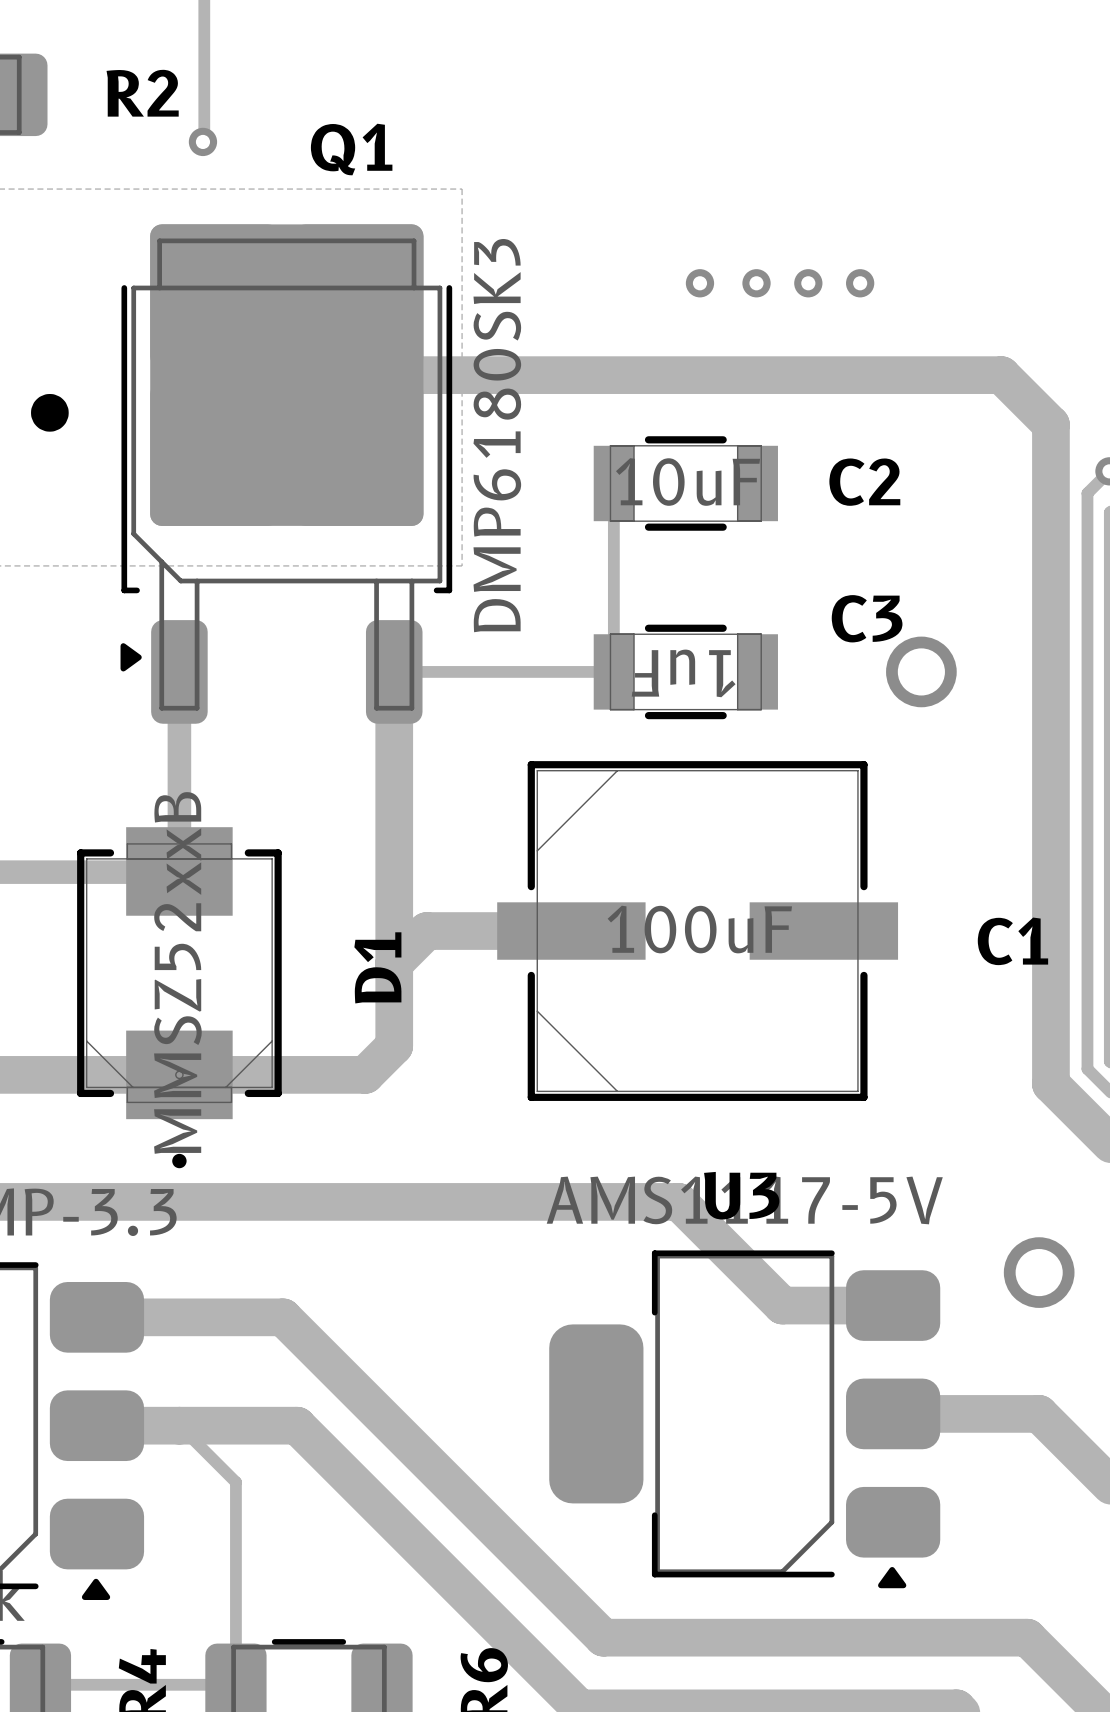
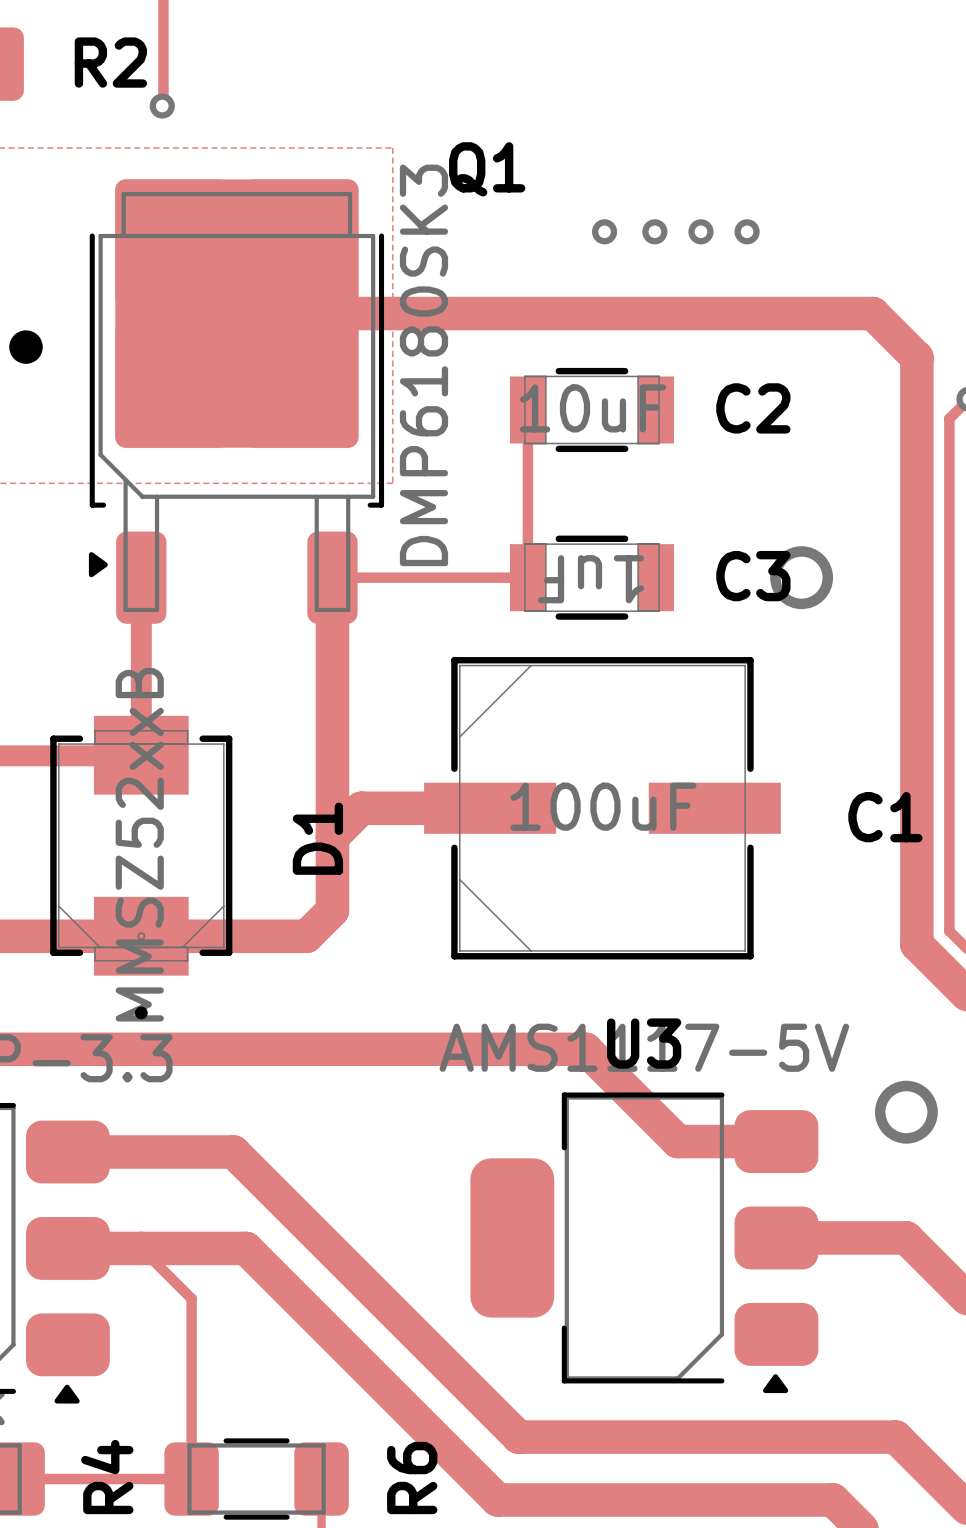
Q1 name position: Q1 (351, 149) -> Q1 (487, 169)
C3 name position: C3 (867, 618) -> C3 (753, 576)

